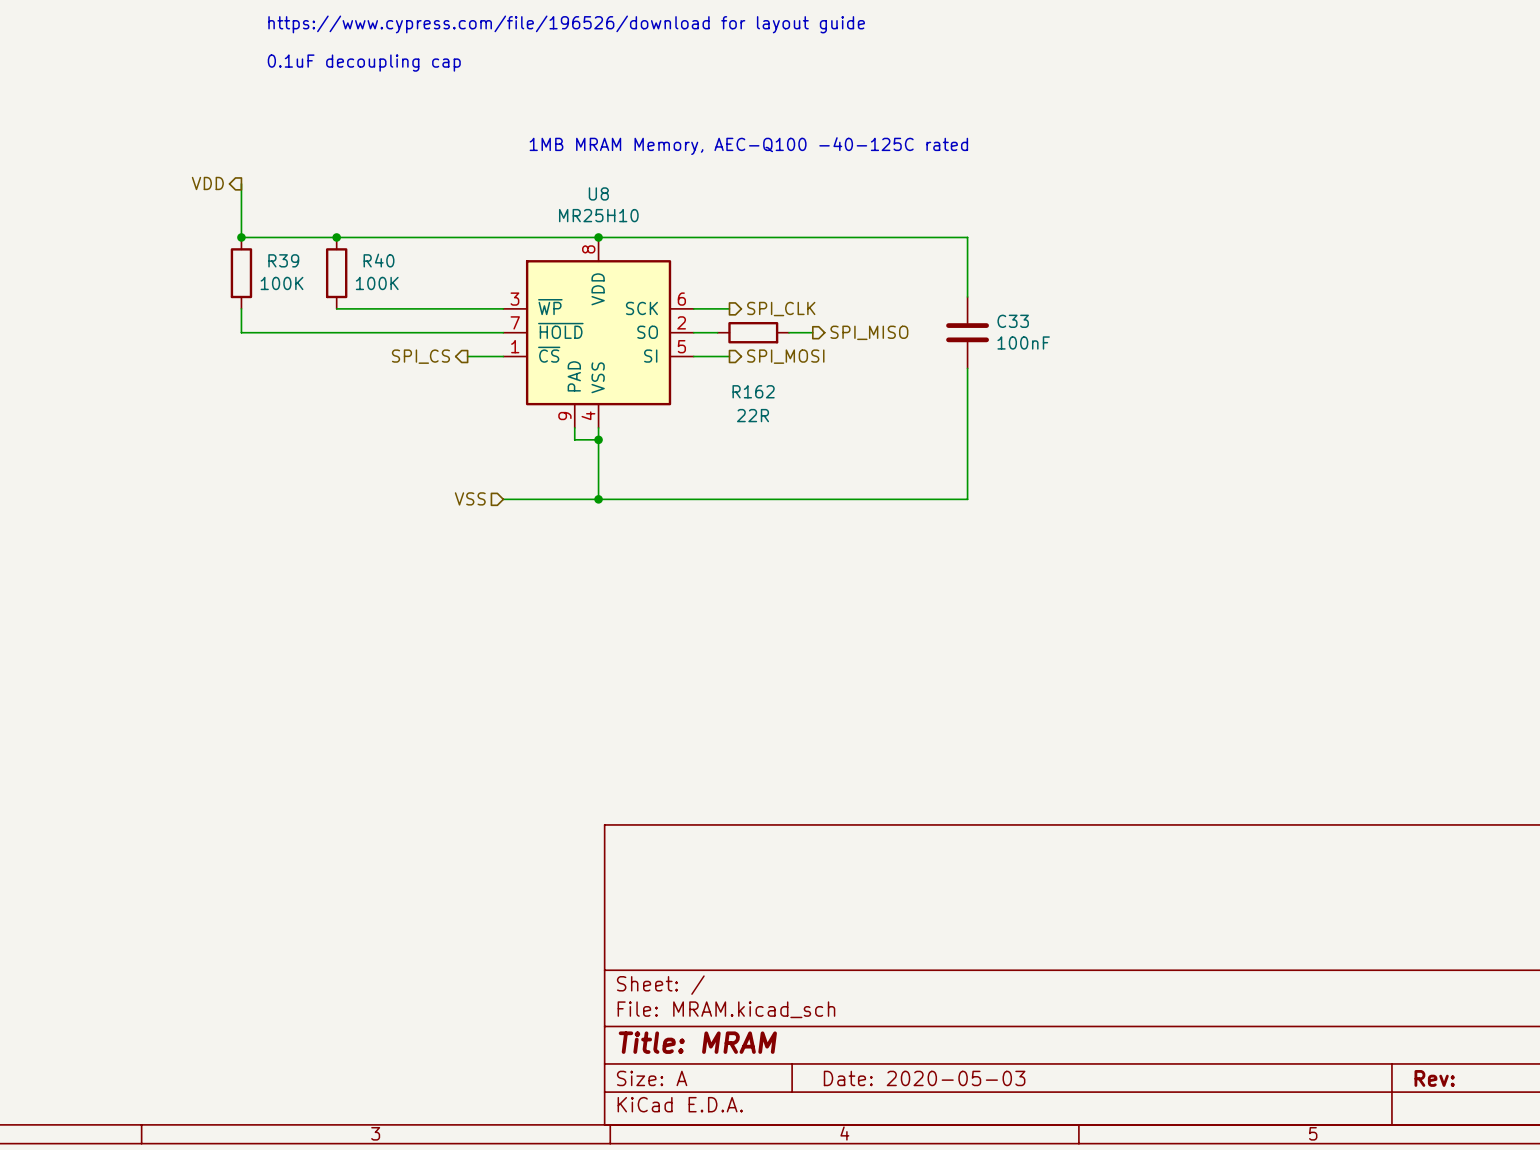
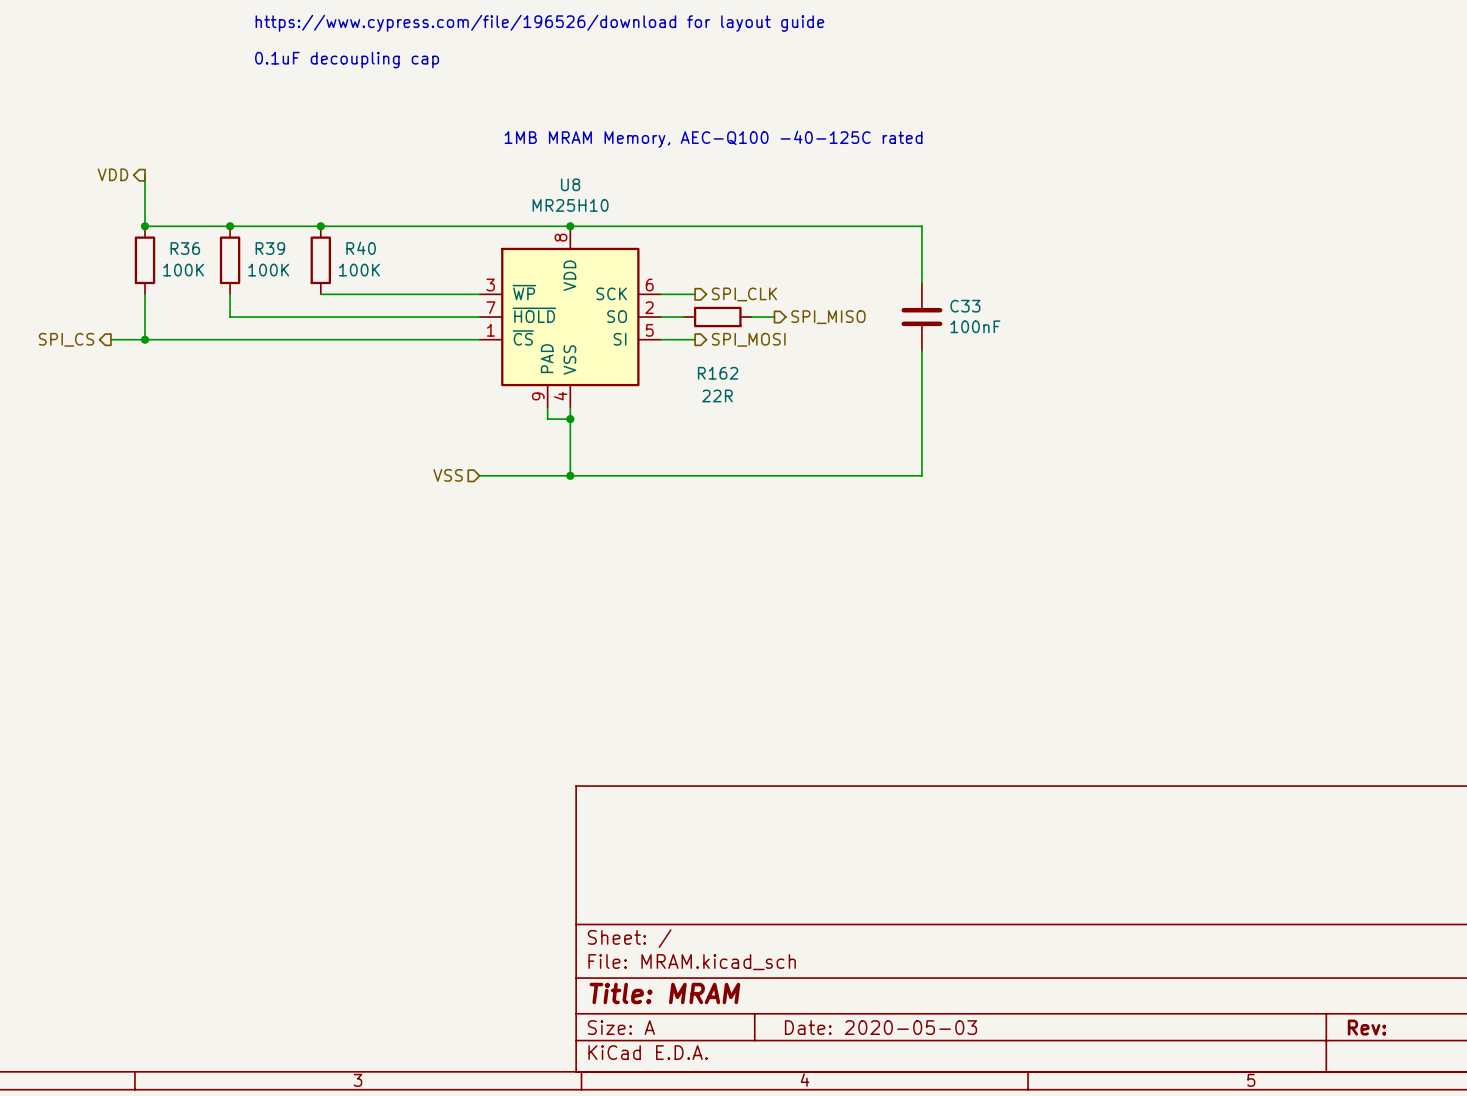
hierarchical label position: VDD (207, 183) -> VDD (112, 174)
wire: (241, 183) (241, 237) -> (145, 175) (145, 226) (230, 226)
junction: none -> (145, 226)
R36: none -> 100K (145, 260)
wire: none -> (145, 294) (145, 339)
hierarchical label: none -> SPI_CS (66, 339)
wire: none -> (110, 339) (445, 339)
junction: none -> (145, 339)
hierarchical label: SPI_CS (420, 356) -> none

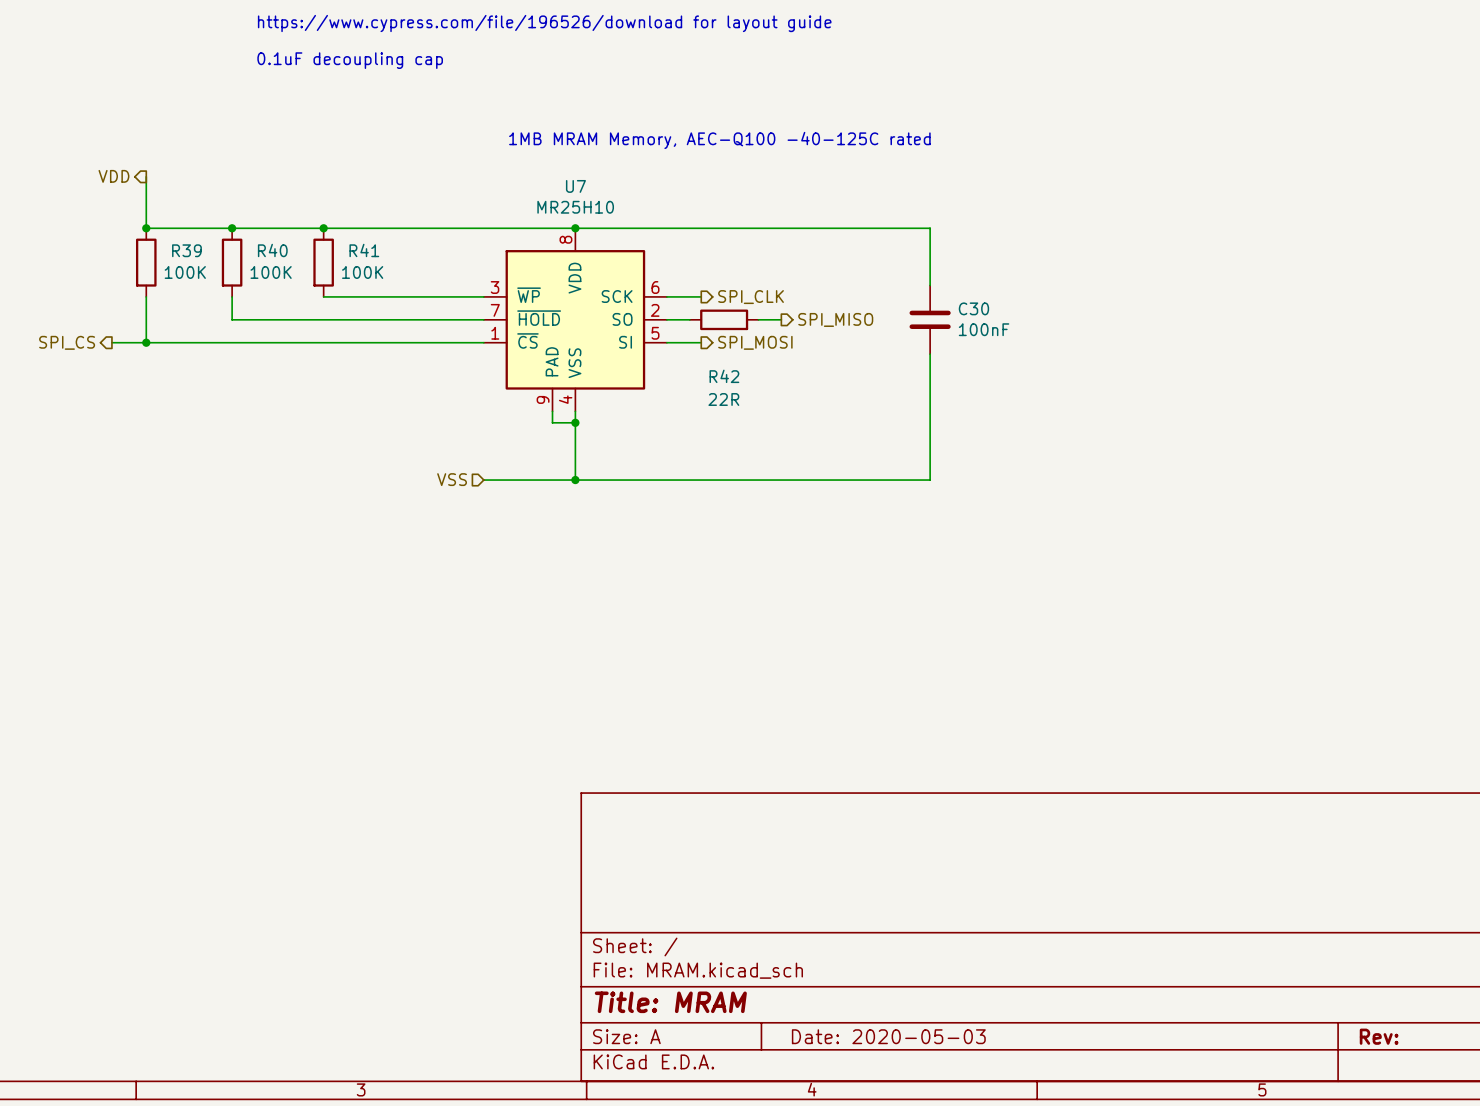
U8 name: U8 (570, 184) -> U7 (575, 186)
R36 name: R36 (185, 248) -> R39 (186, 250)
R39 name: R39 (270, 248) -> R40 (272, 250)
R40 name: R40 (361, 248) -> R41 (364, 250)
C33 name: C33 (965, 306) -> C30 (973, 308)
R162 name: R162 (718, 373) -> R42 (724, 376)

